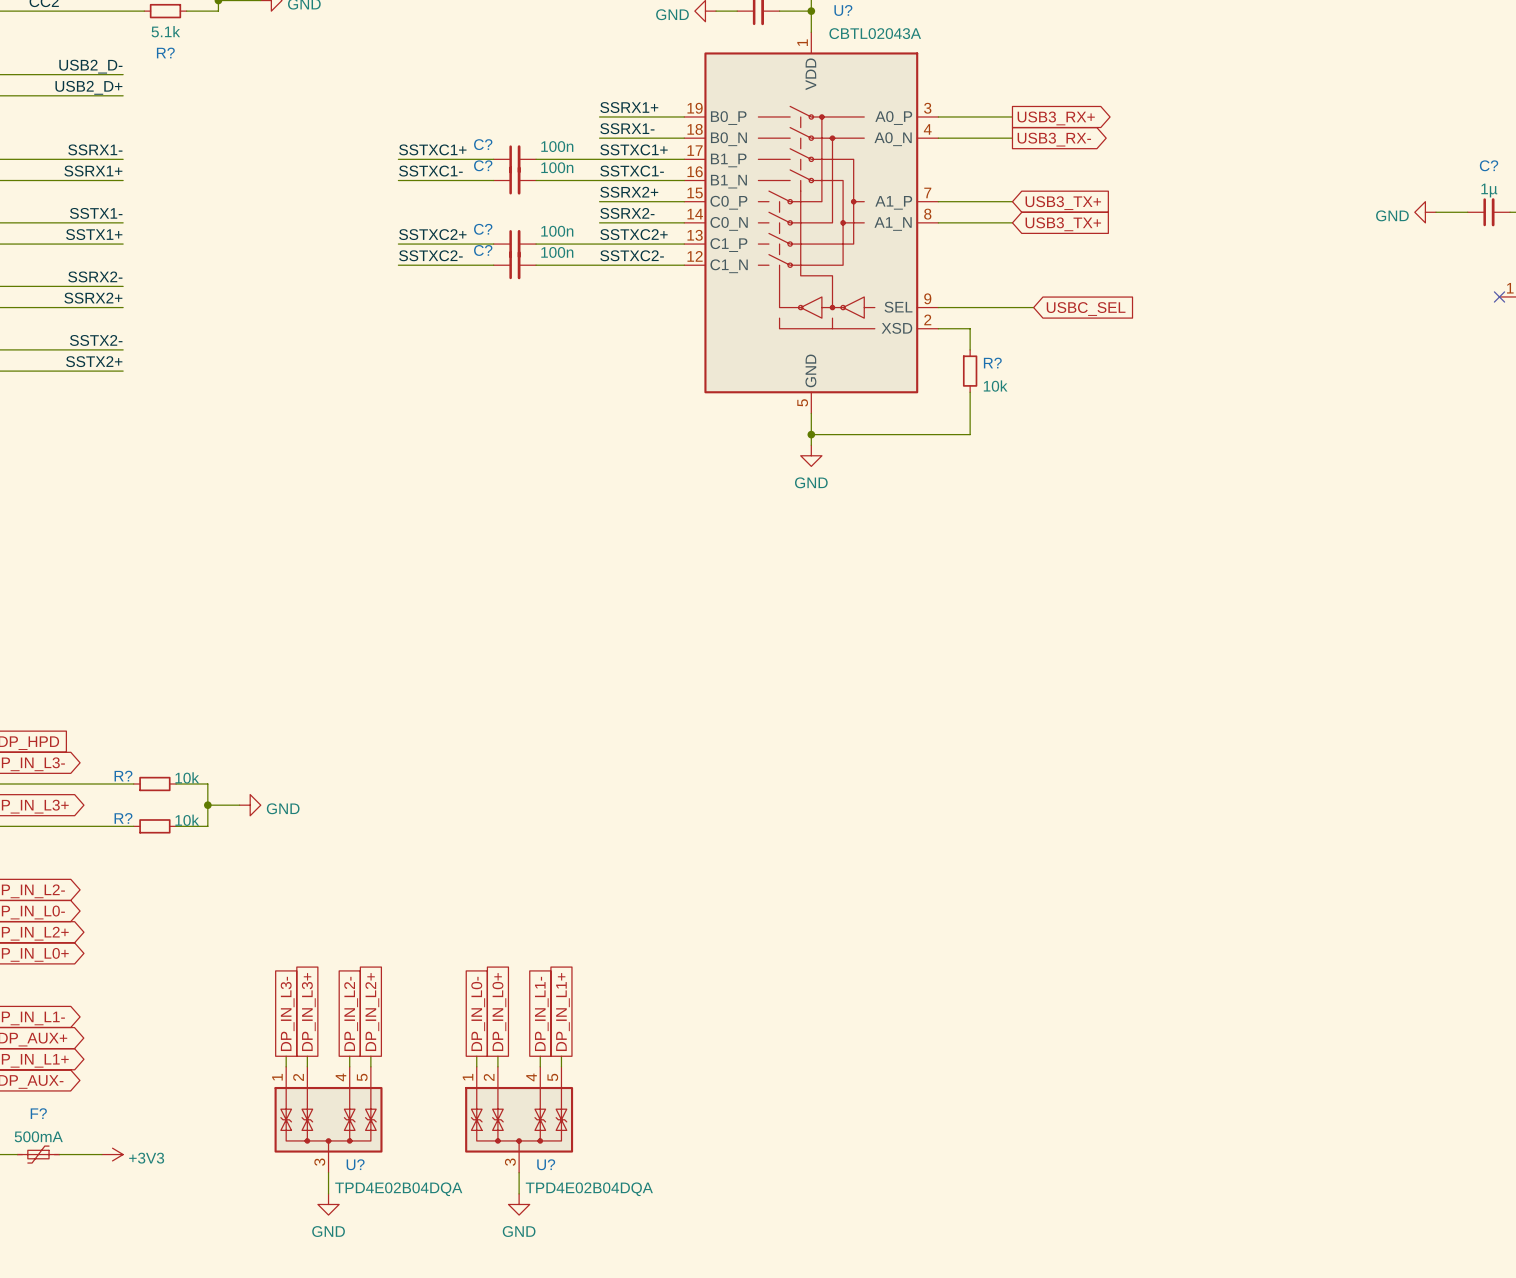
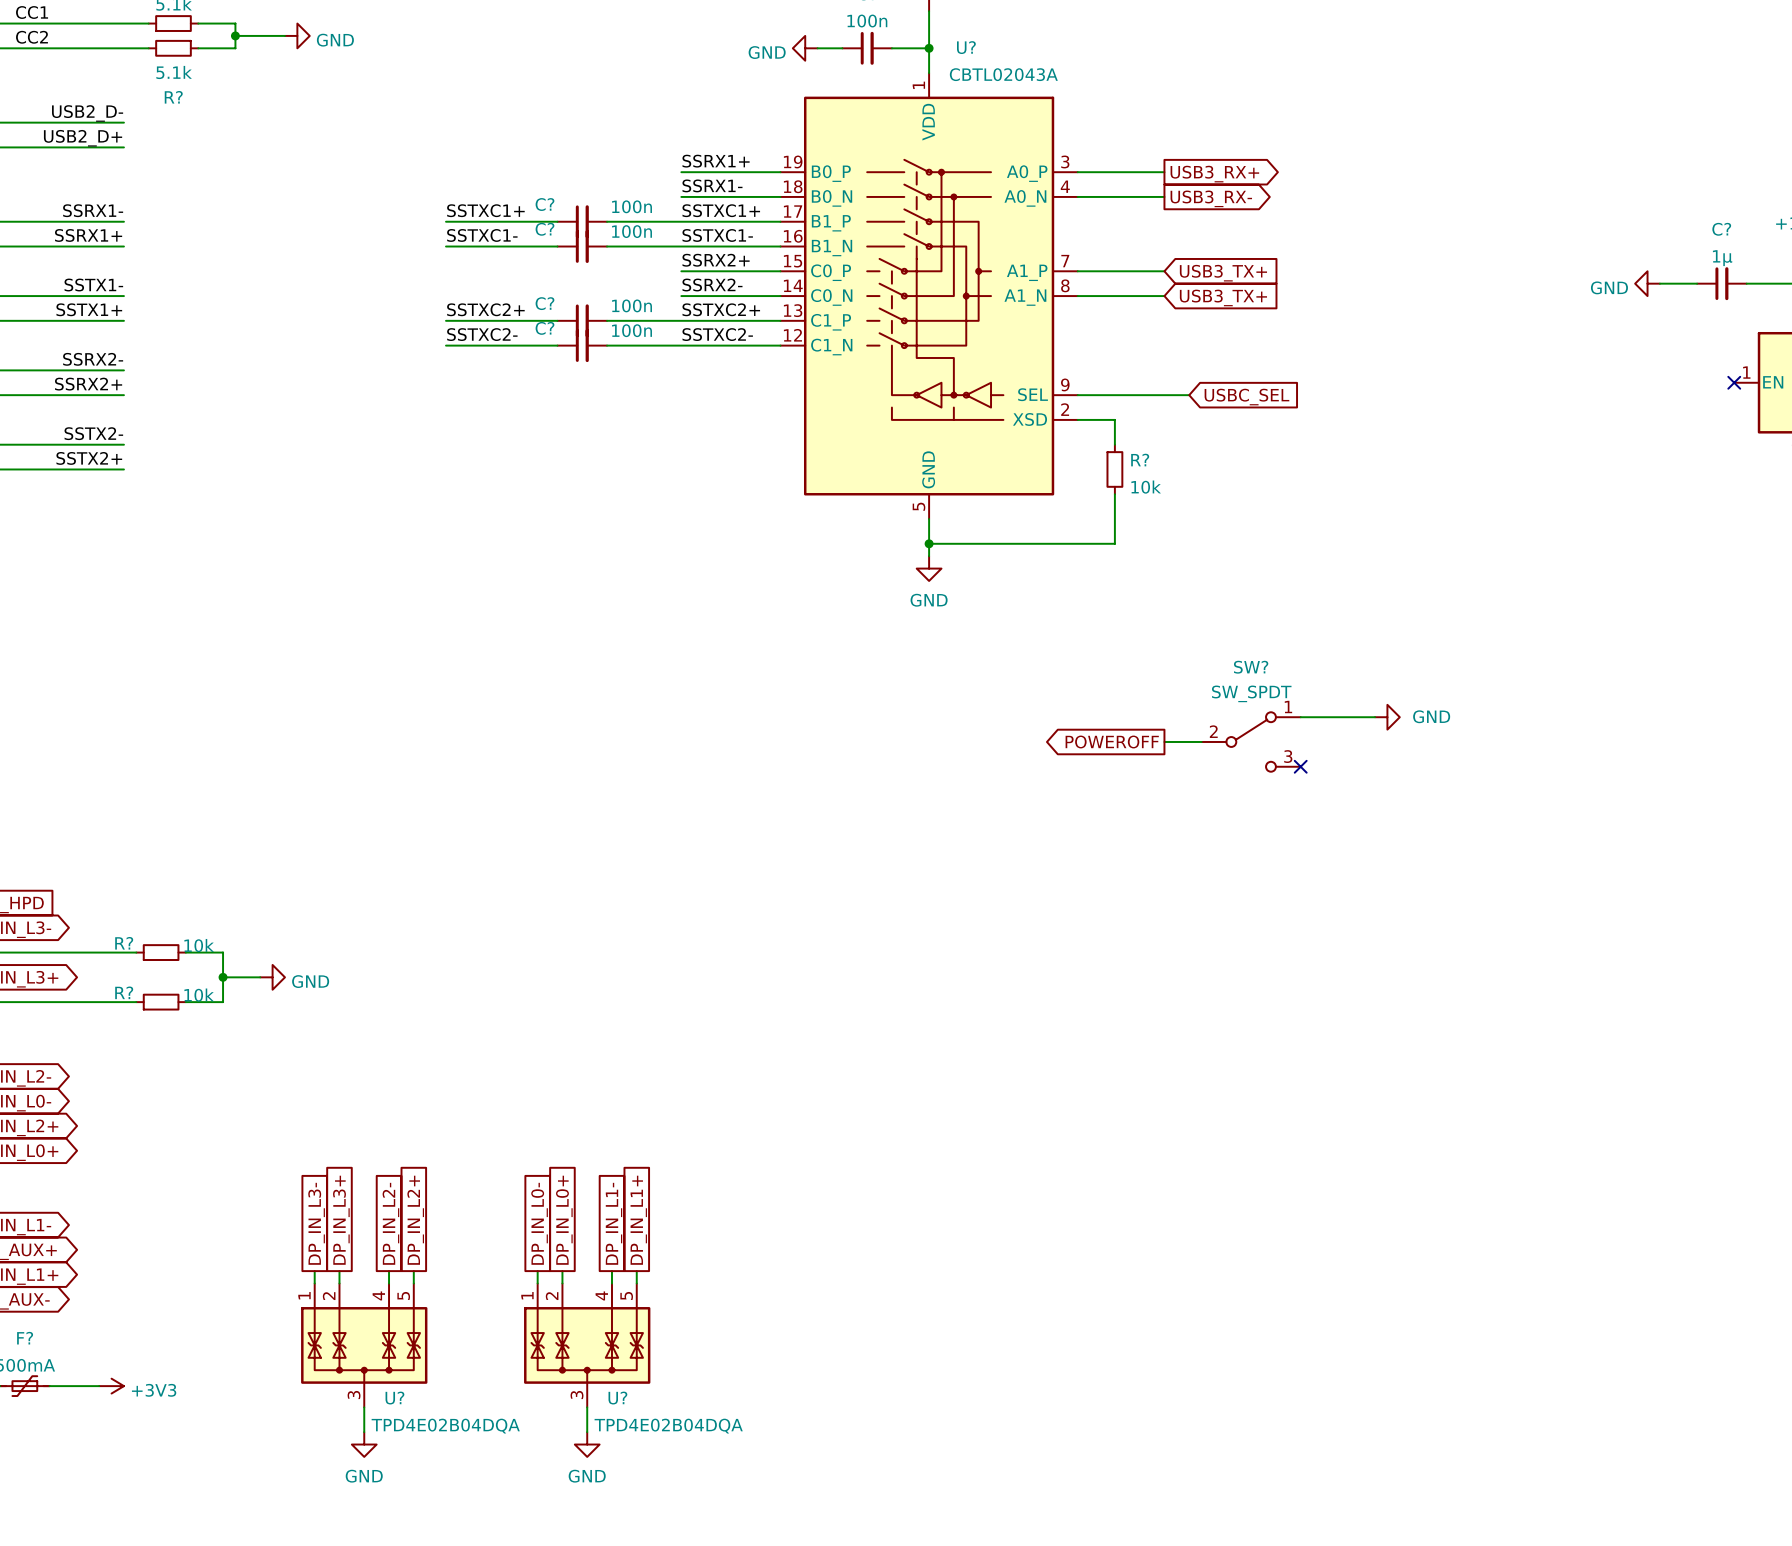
wire: none -> (1300, 717) (1375, 717)
power symbol: none -> GND (1387, 717)
global label: none -> POWEROFF (1112, 742)
wire: none -> (1164, 741) (1201, 741)
SW?: none -> SW_SPDT (1251, 741)
no-connect mark: none -> (1300, 766)

